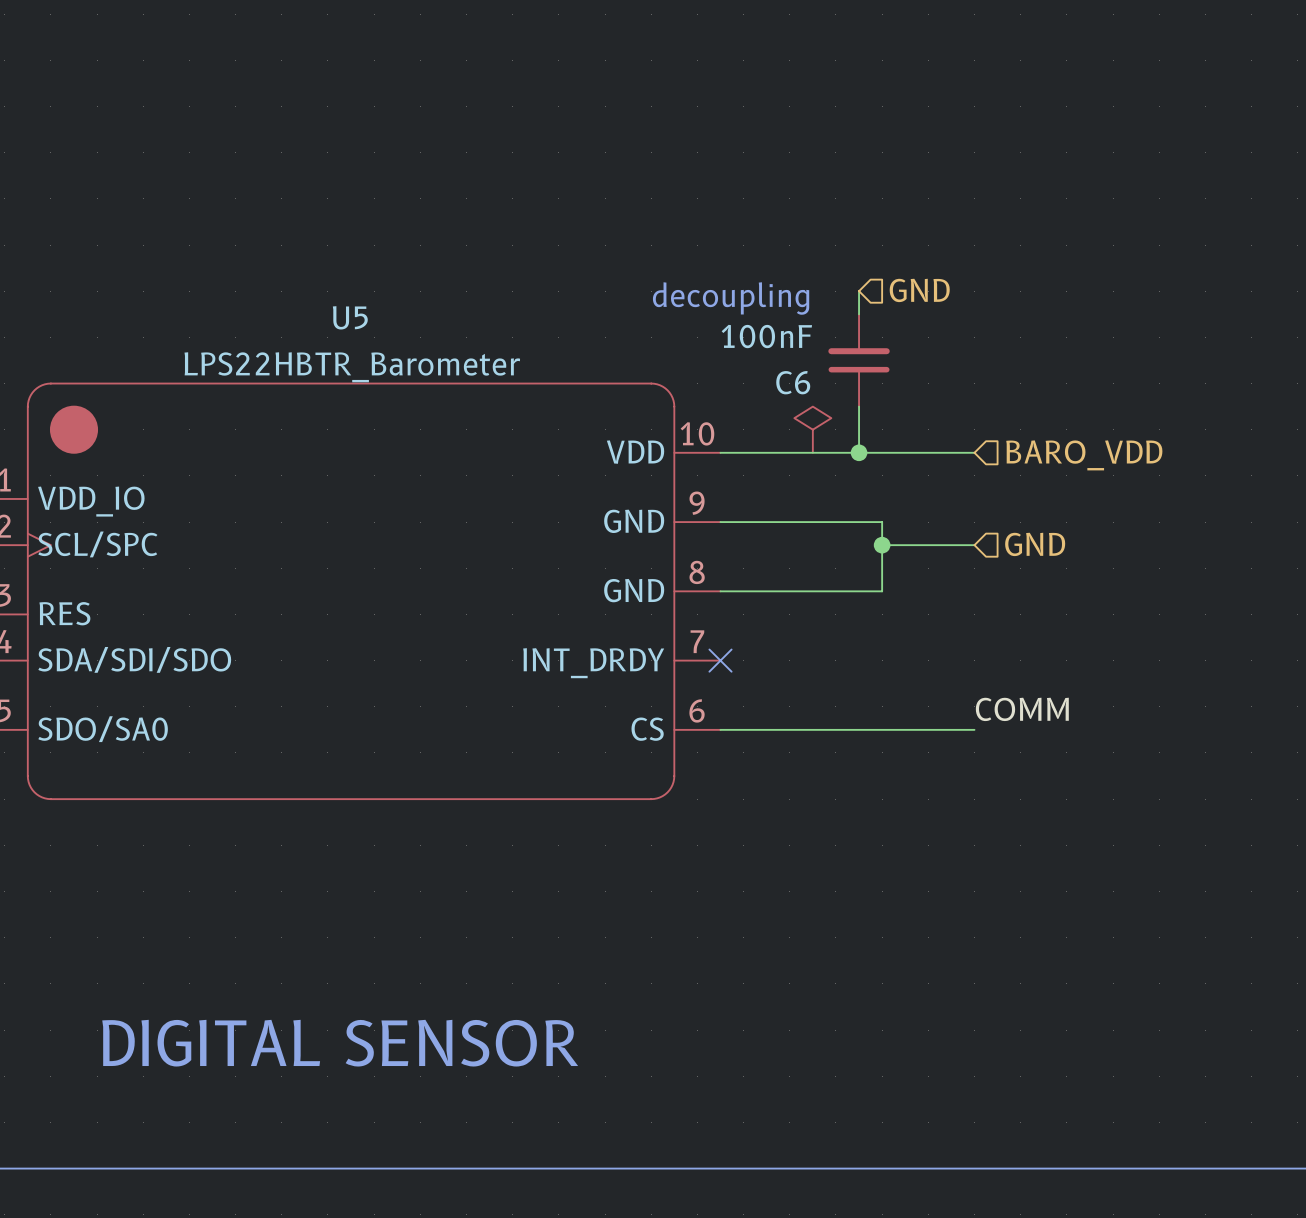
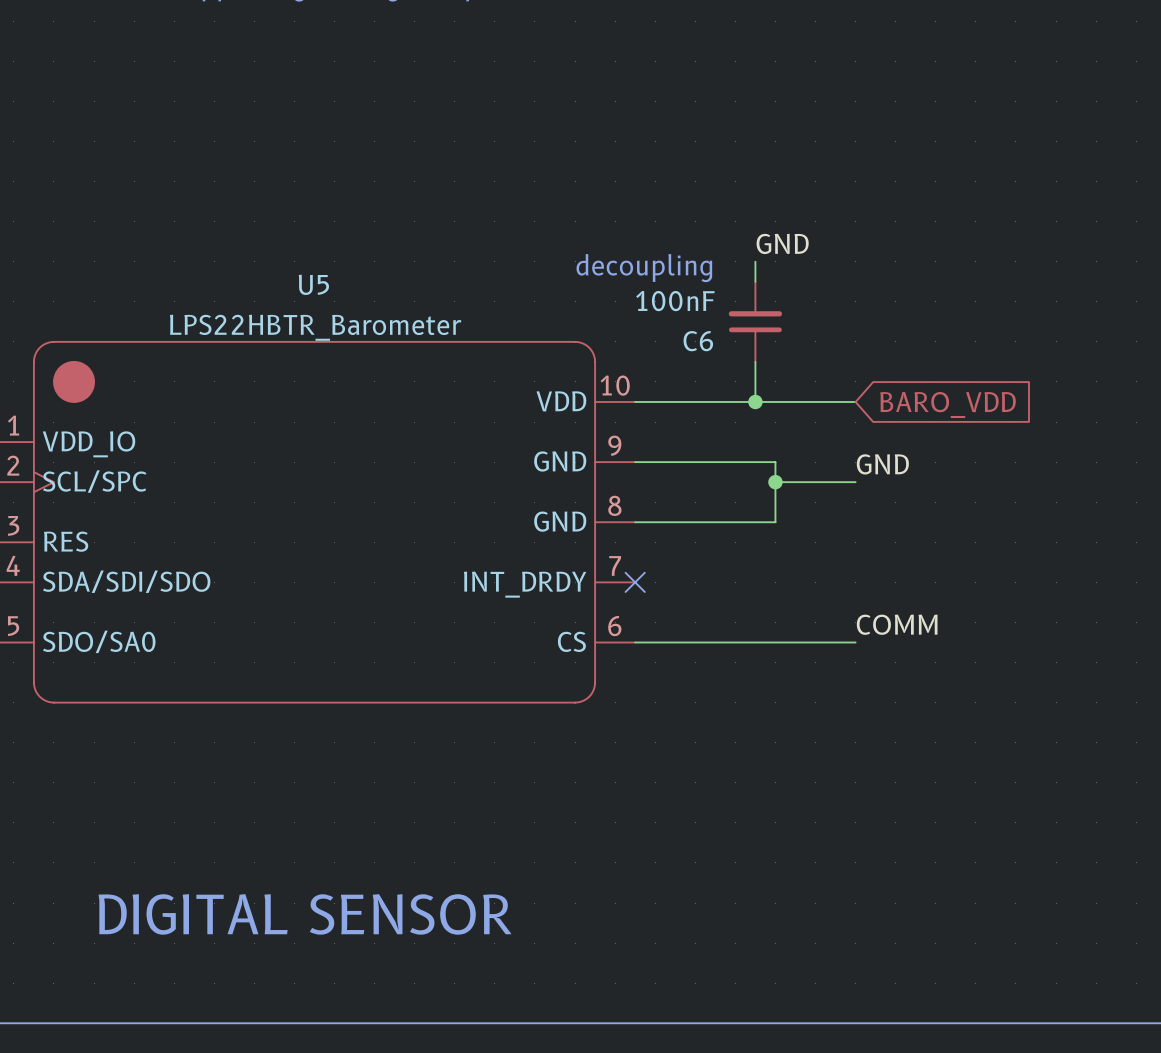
label: none -> GND (782, 243)
hierarchical label: GND (919, 290) -> none
power symbol: (812, 429) -> none
hierarchical label: BARO_VDD (1084, 455) -> none
global label: none -> BARO_VDD (948, 404)
label: none -> GND (882, 464)
hierarchical label: GND (1035, 544) -> none

